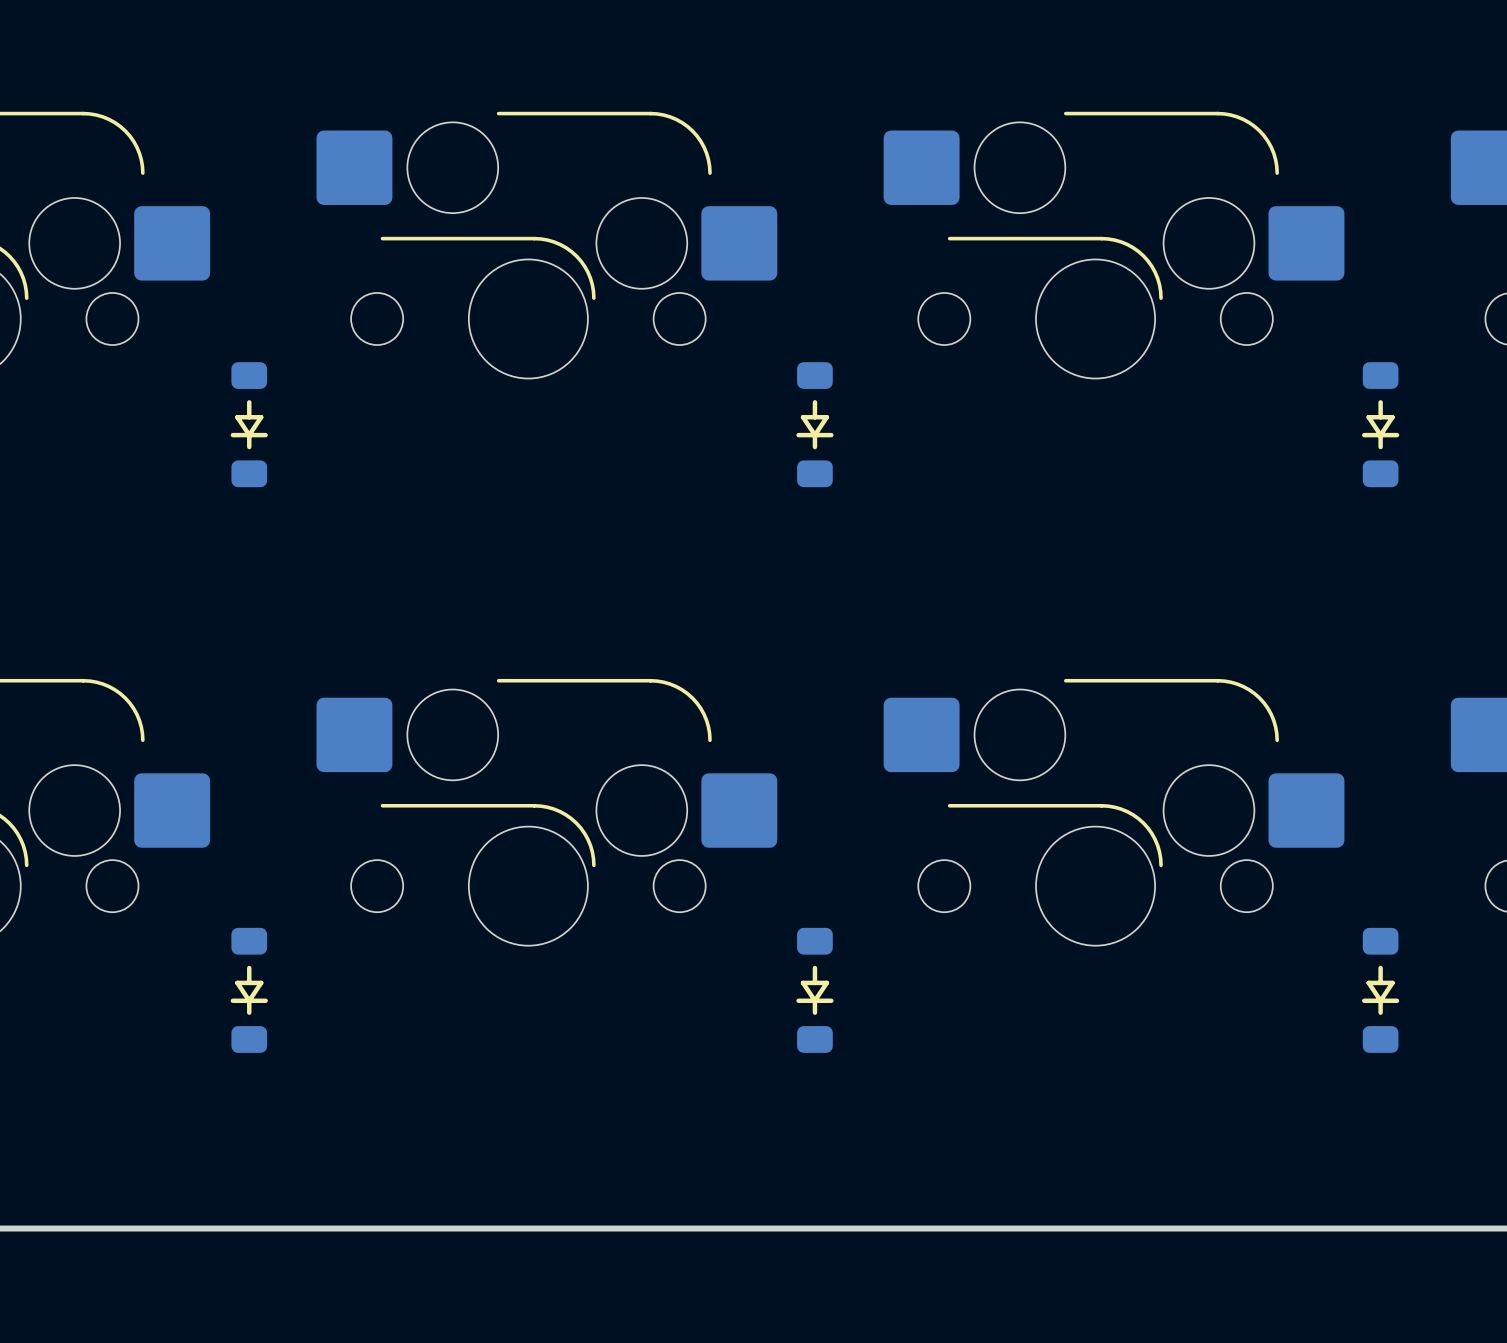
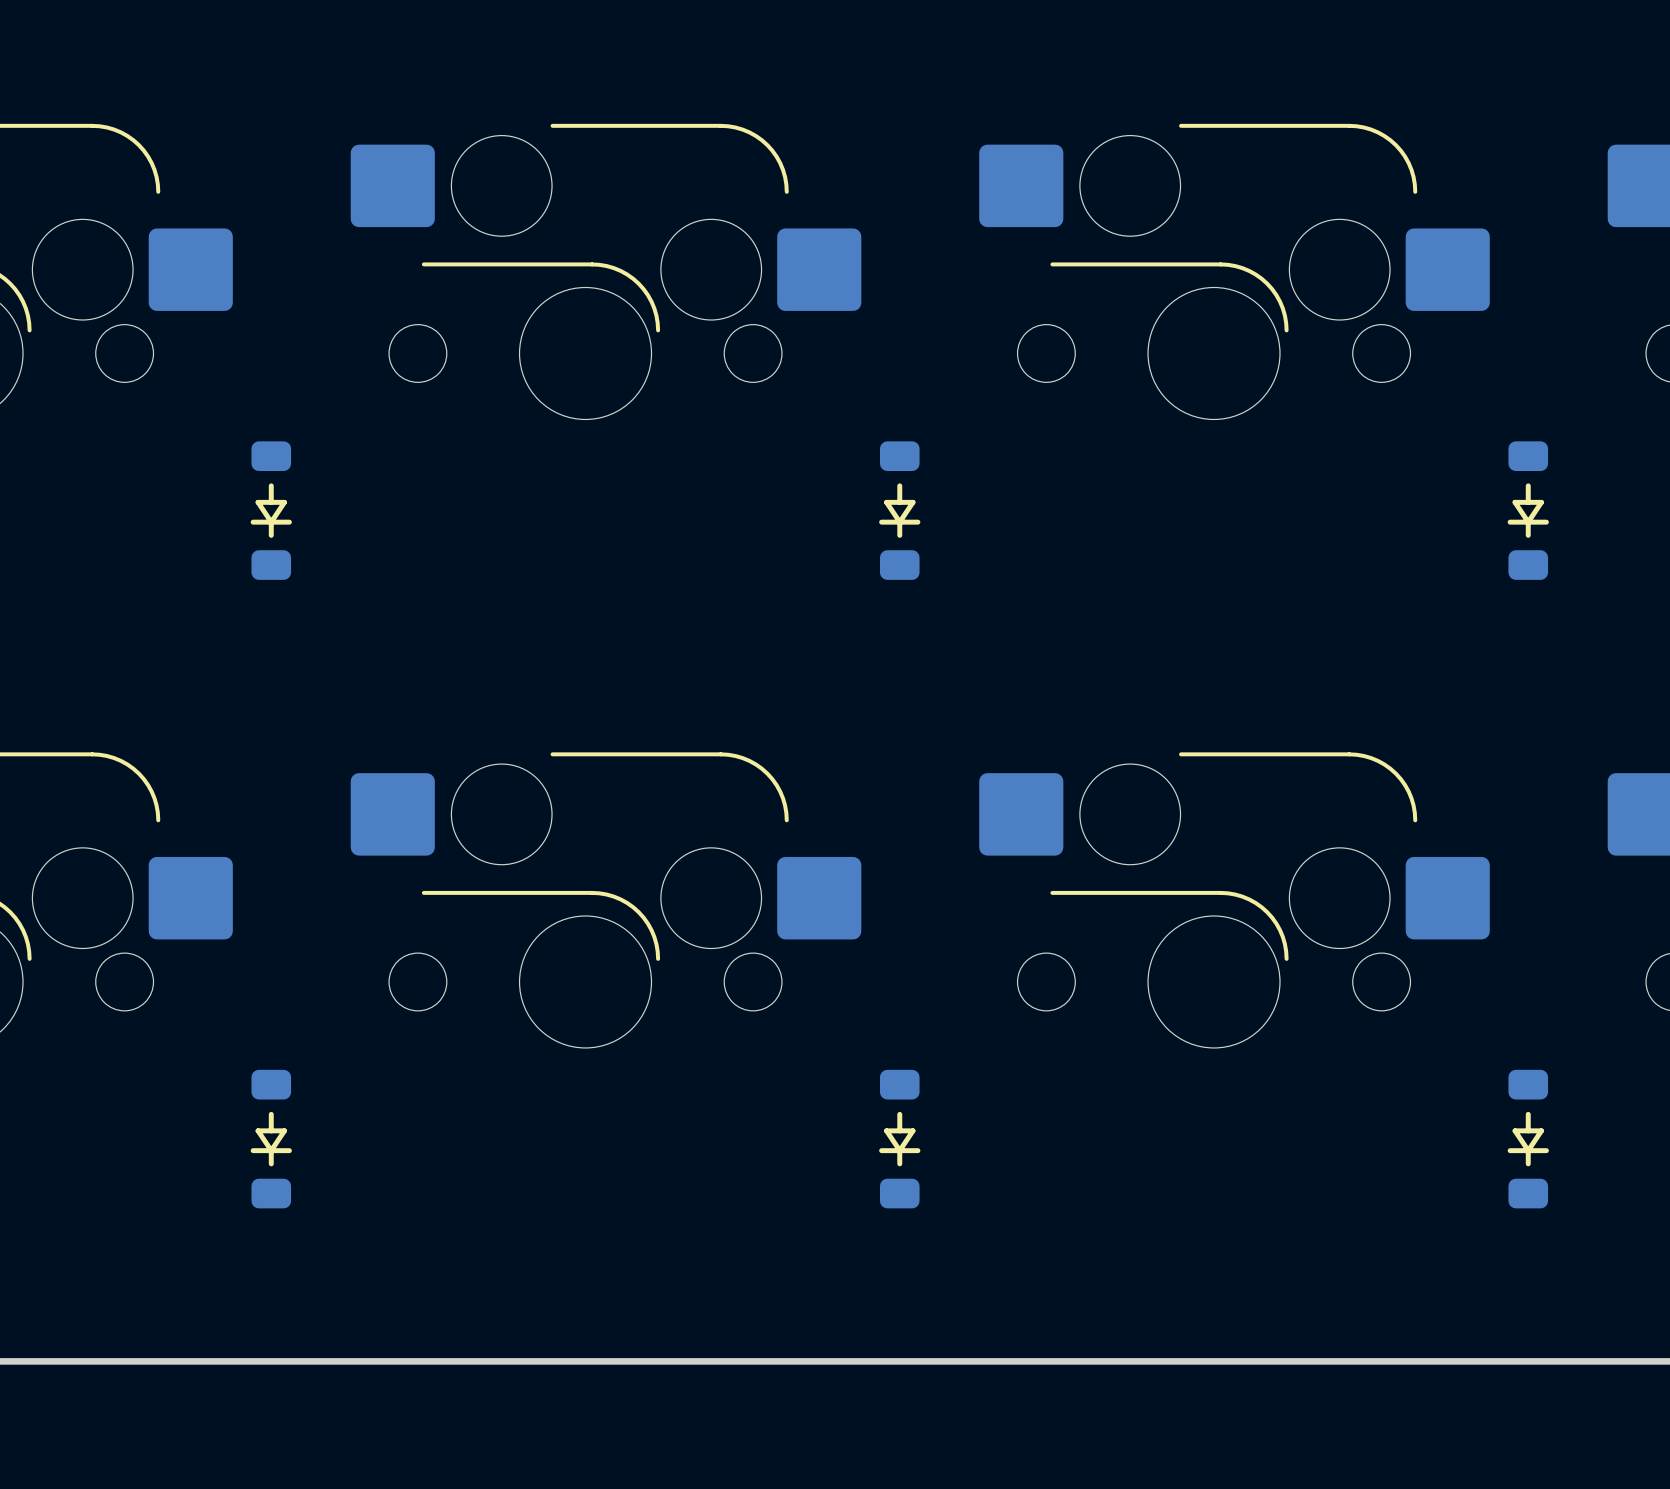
part position: (249, 424) -> (271, 510)
part position: (814, 424) -> (899, 510)
part position: (1380, 424) -> (1528, 510)
part position: (249, 990) -> (271, 1139)
part position: (814, 990) -> (899, 1139)
part position: (1380, 990) -> (1528, 1139)

